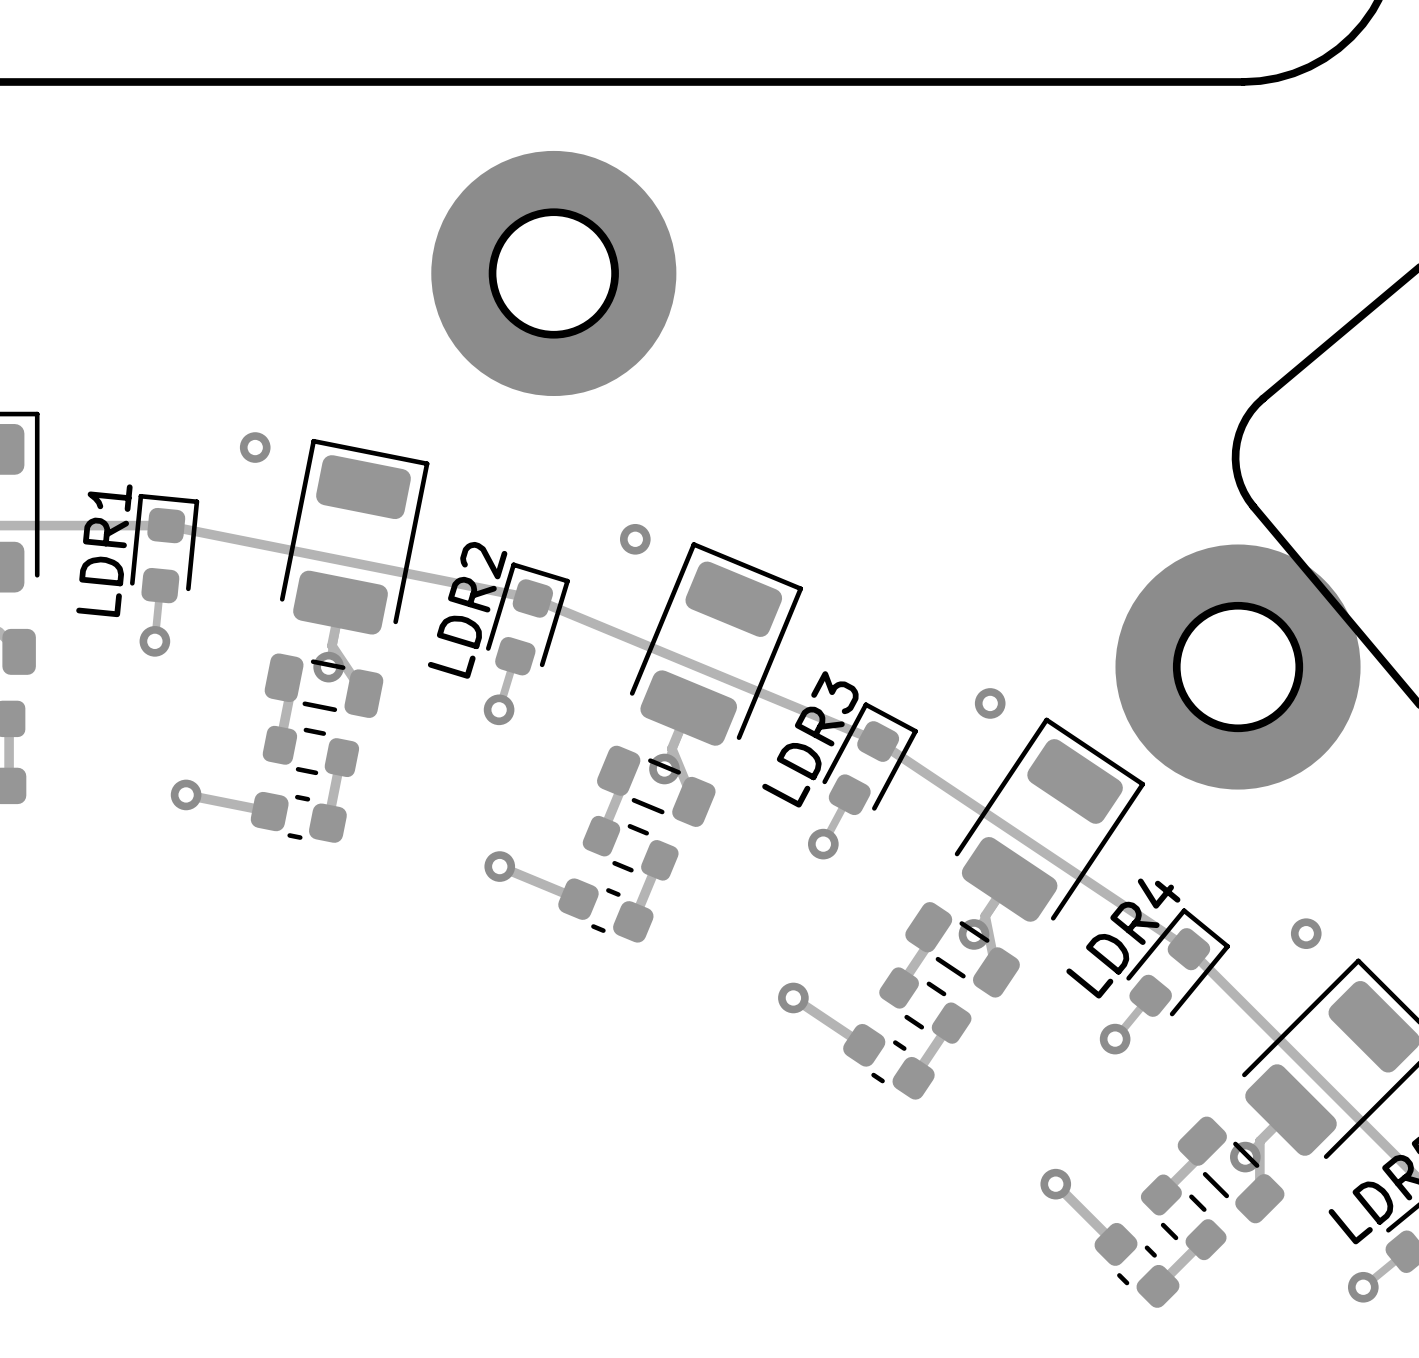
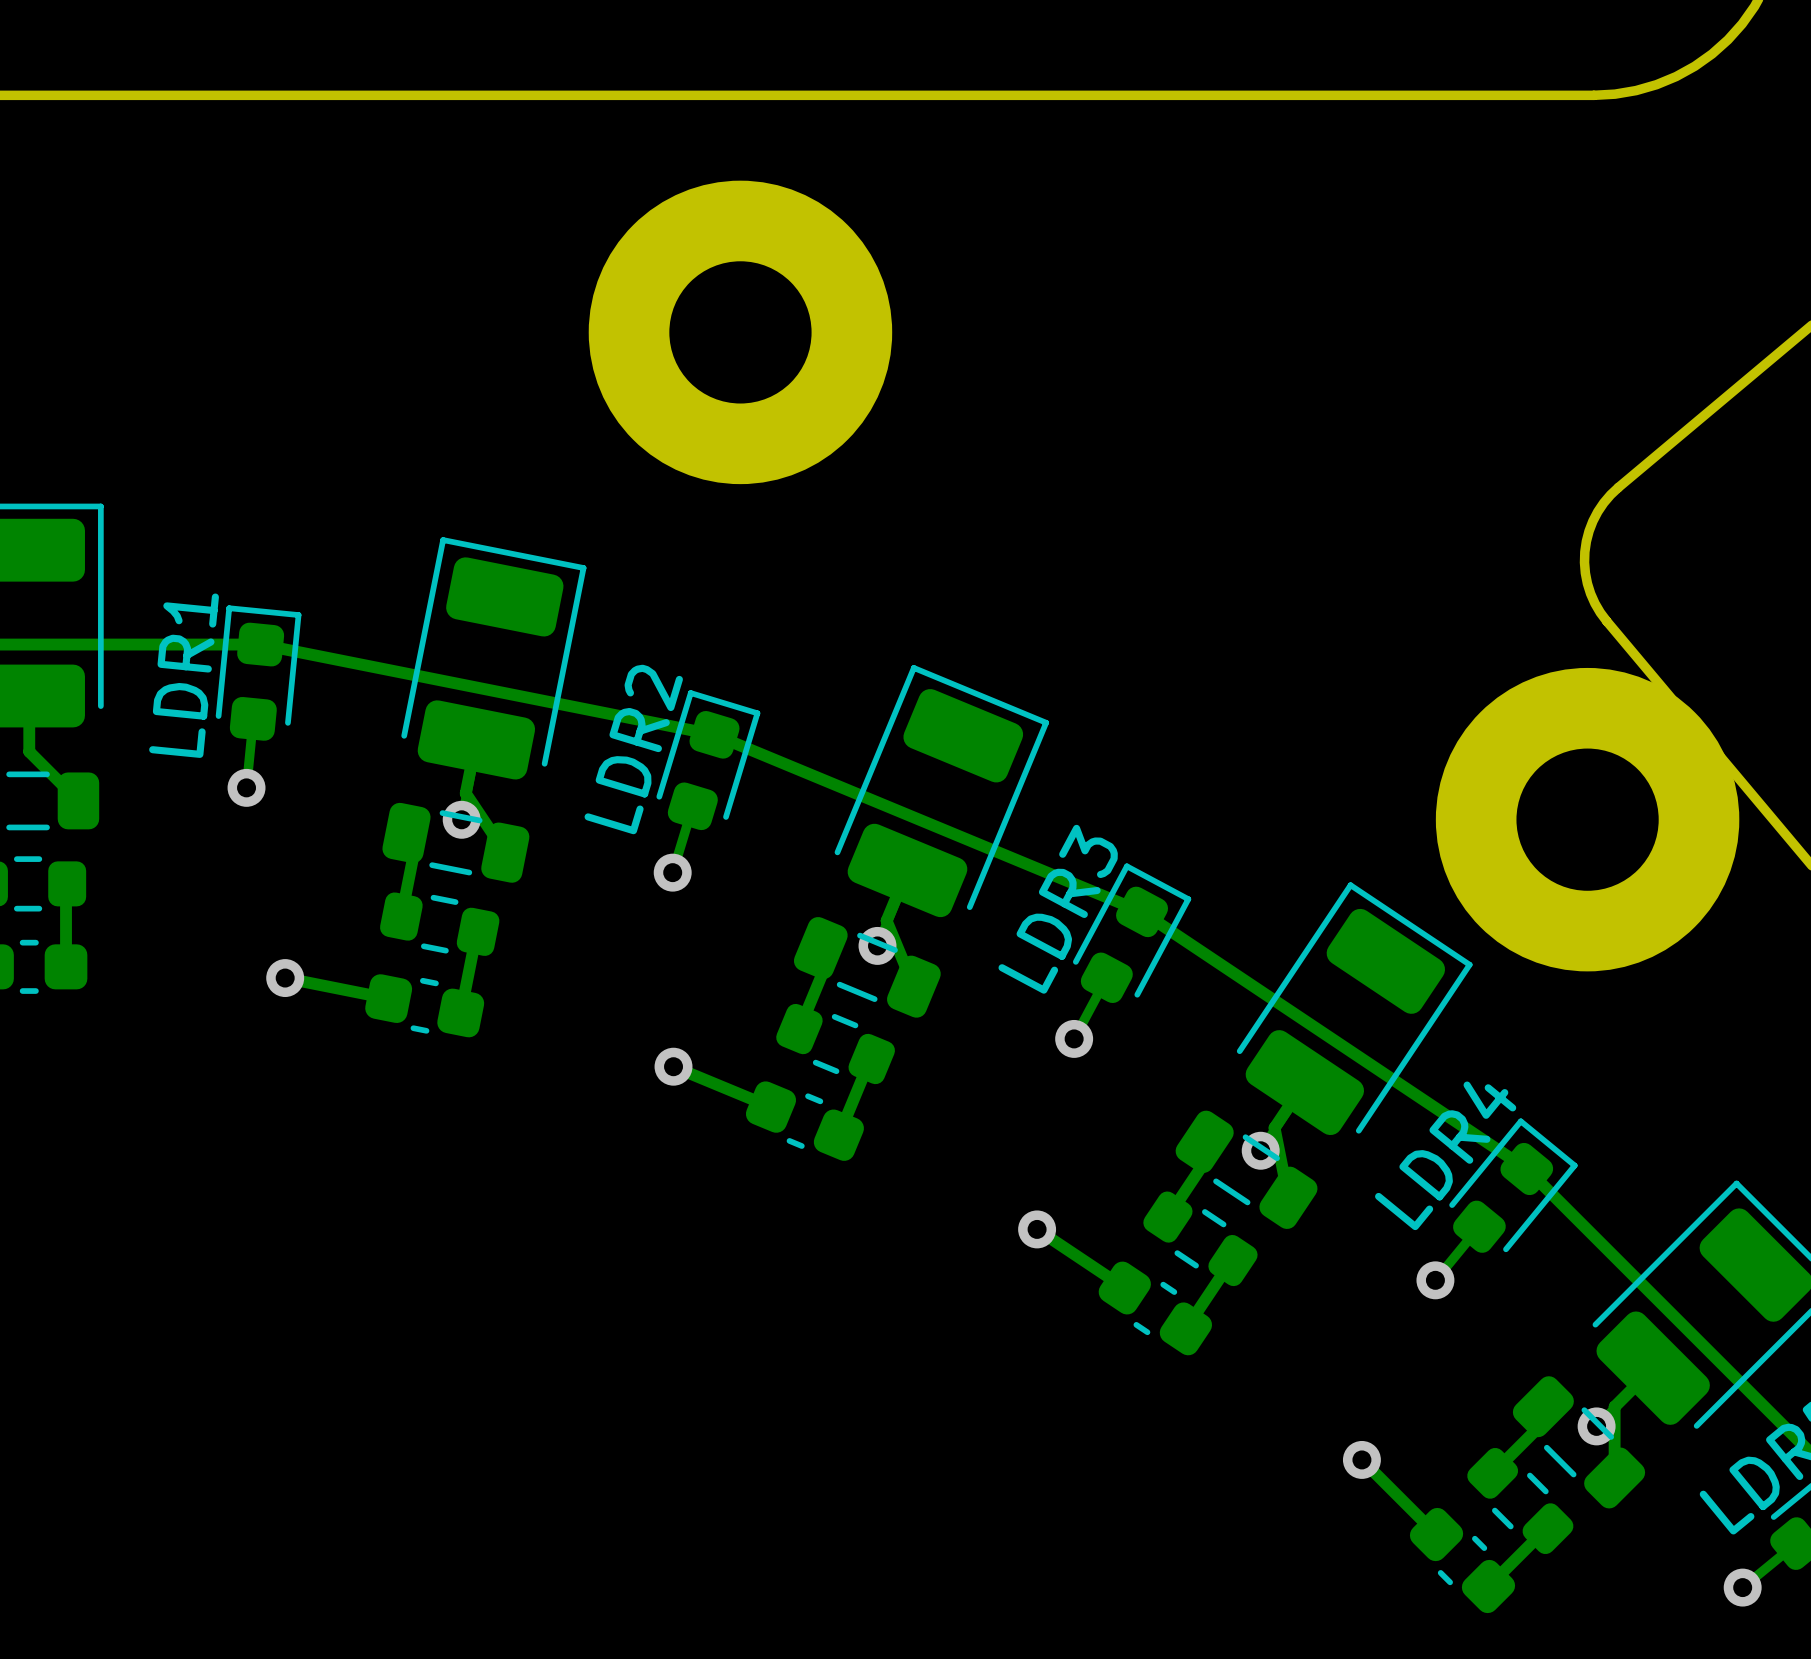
via: (255, 447) -> none
via: (635, 539) -> none
via: (990, 703) -> none
via: (1306, 933) -> none

